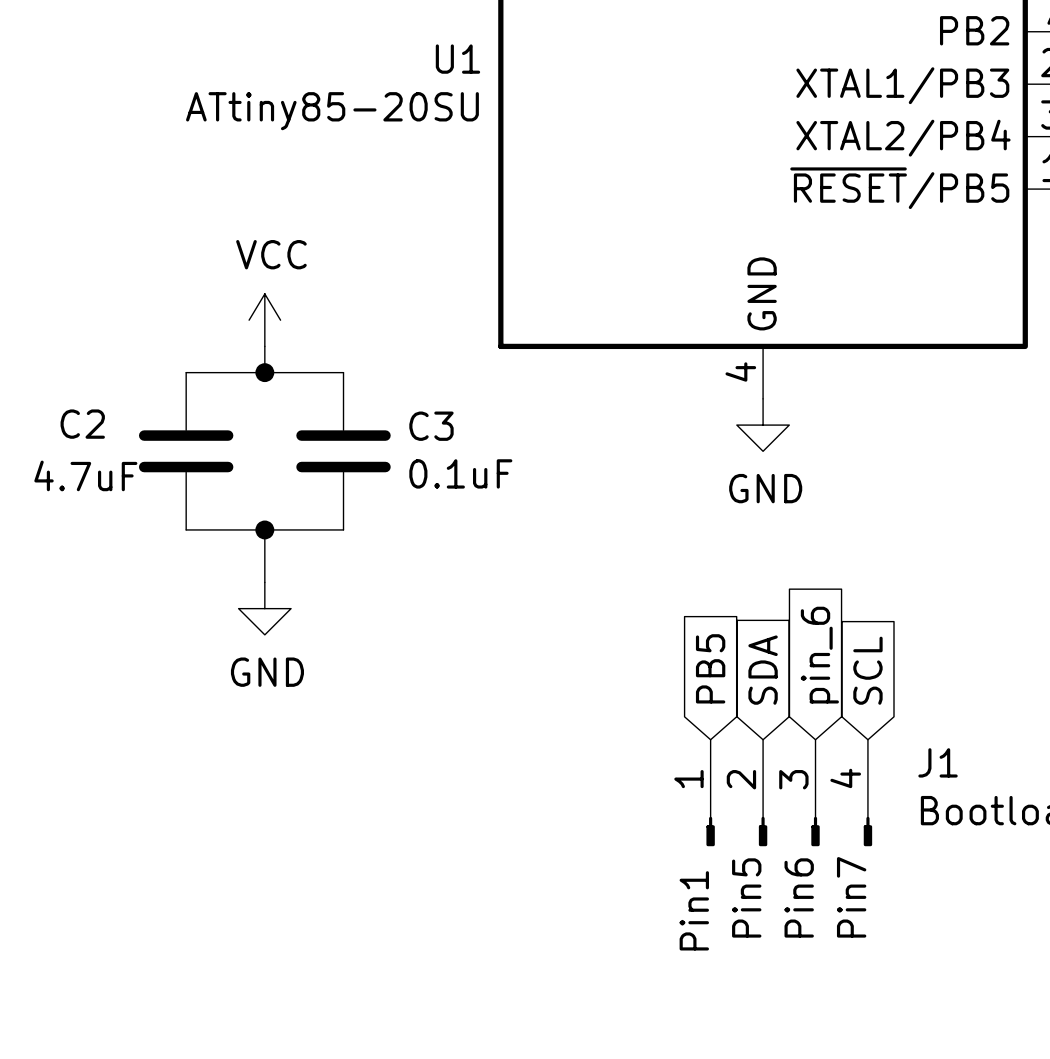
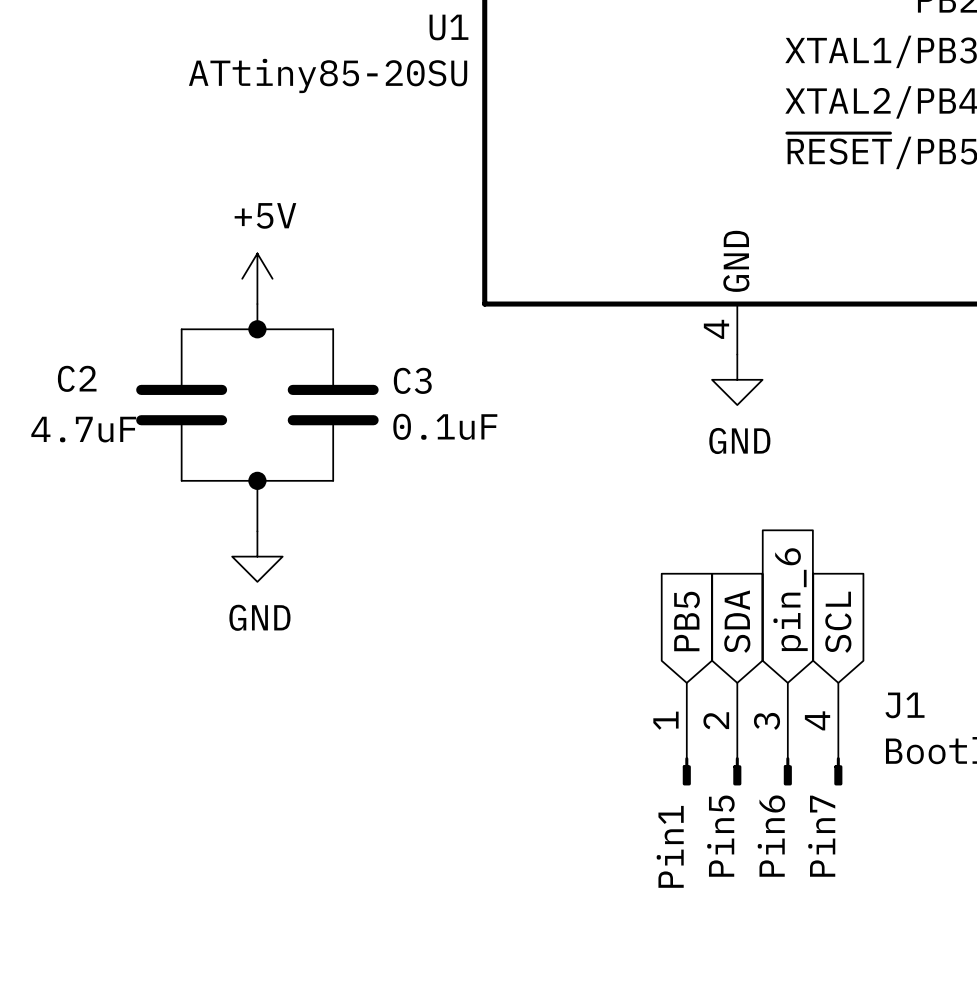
power symbol: VCC (264, 320) -> +5V (257, 278)

